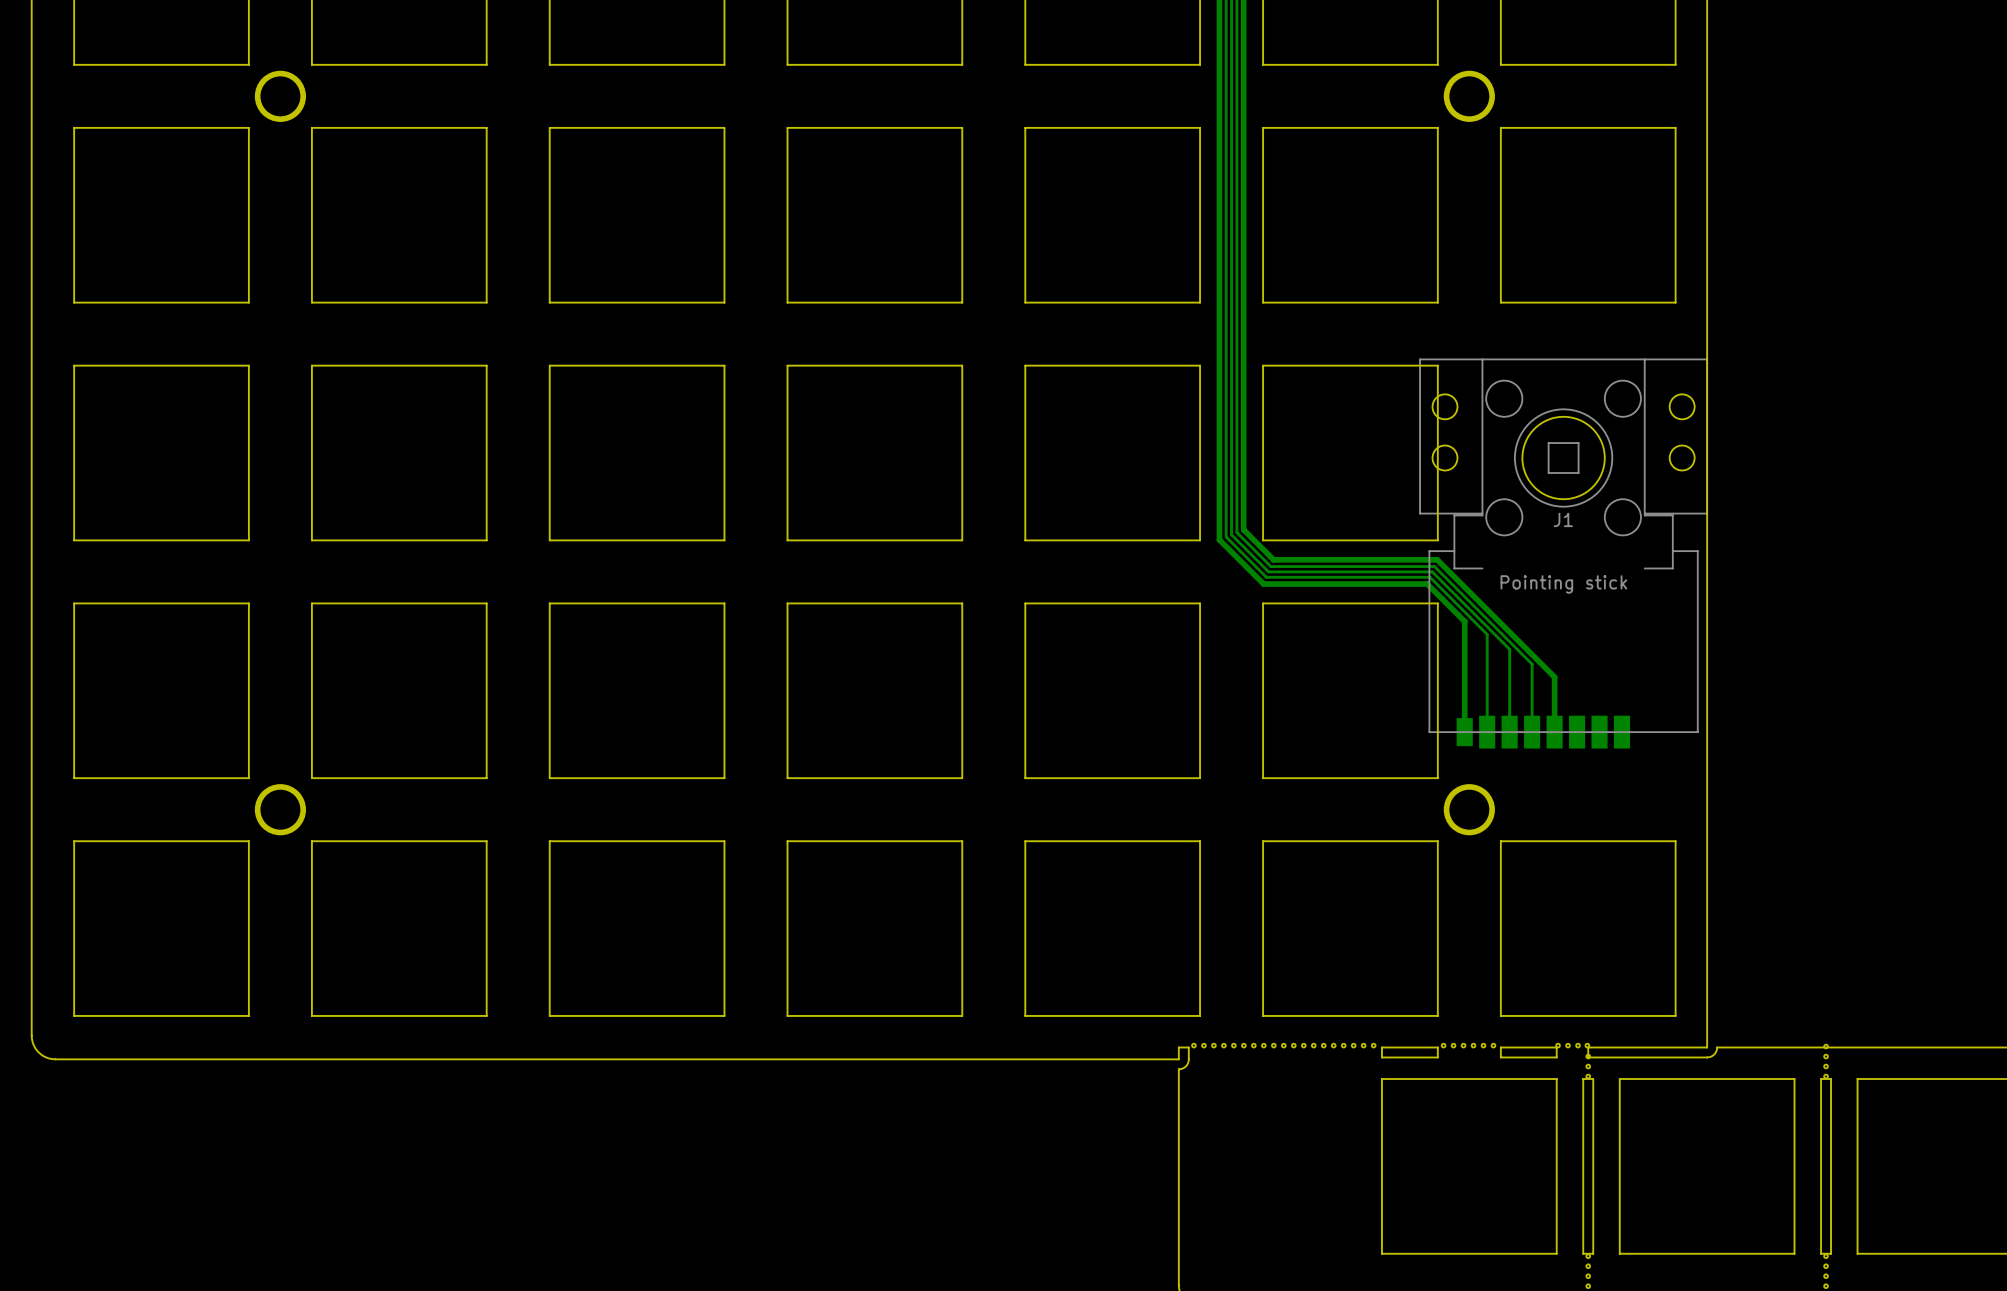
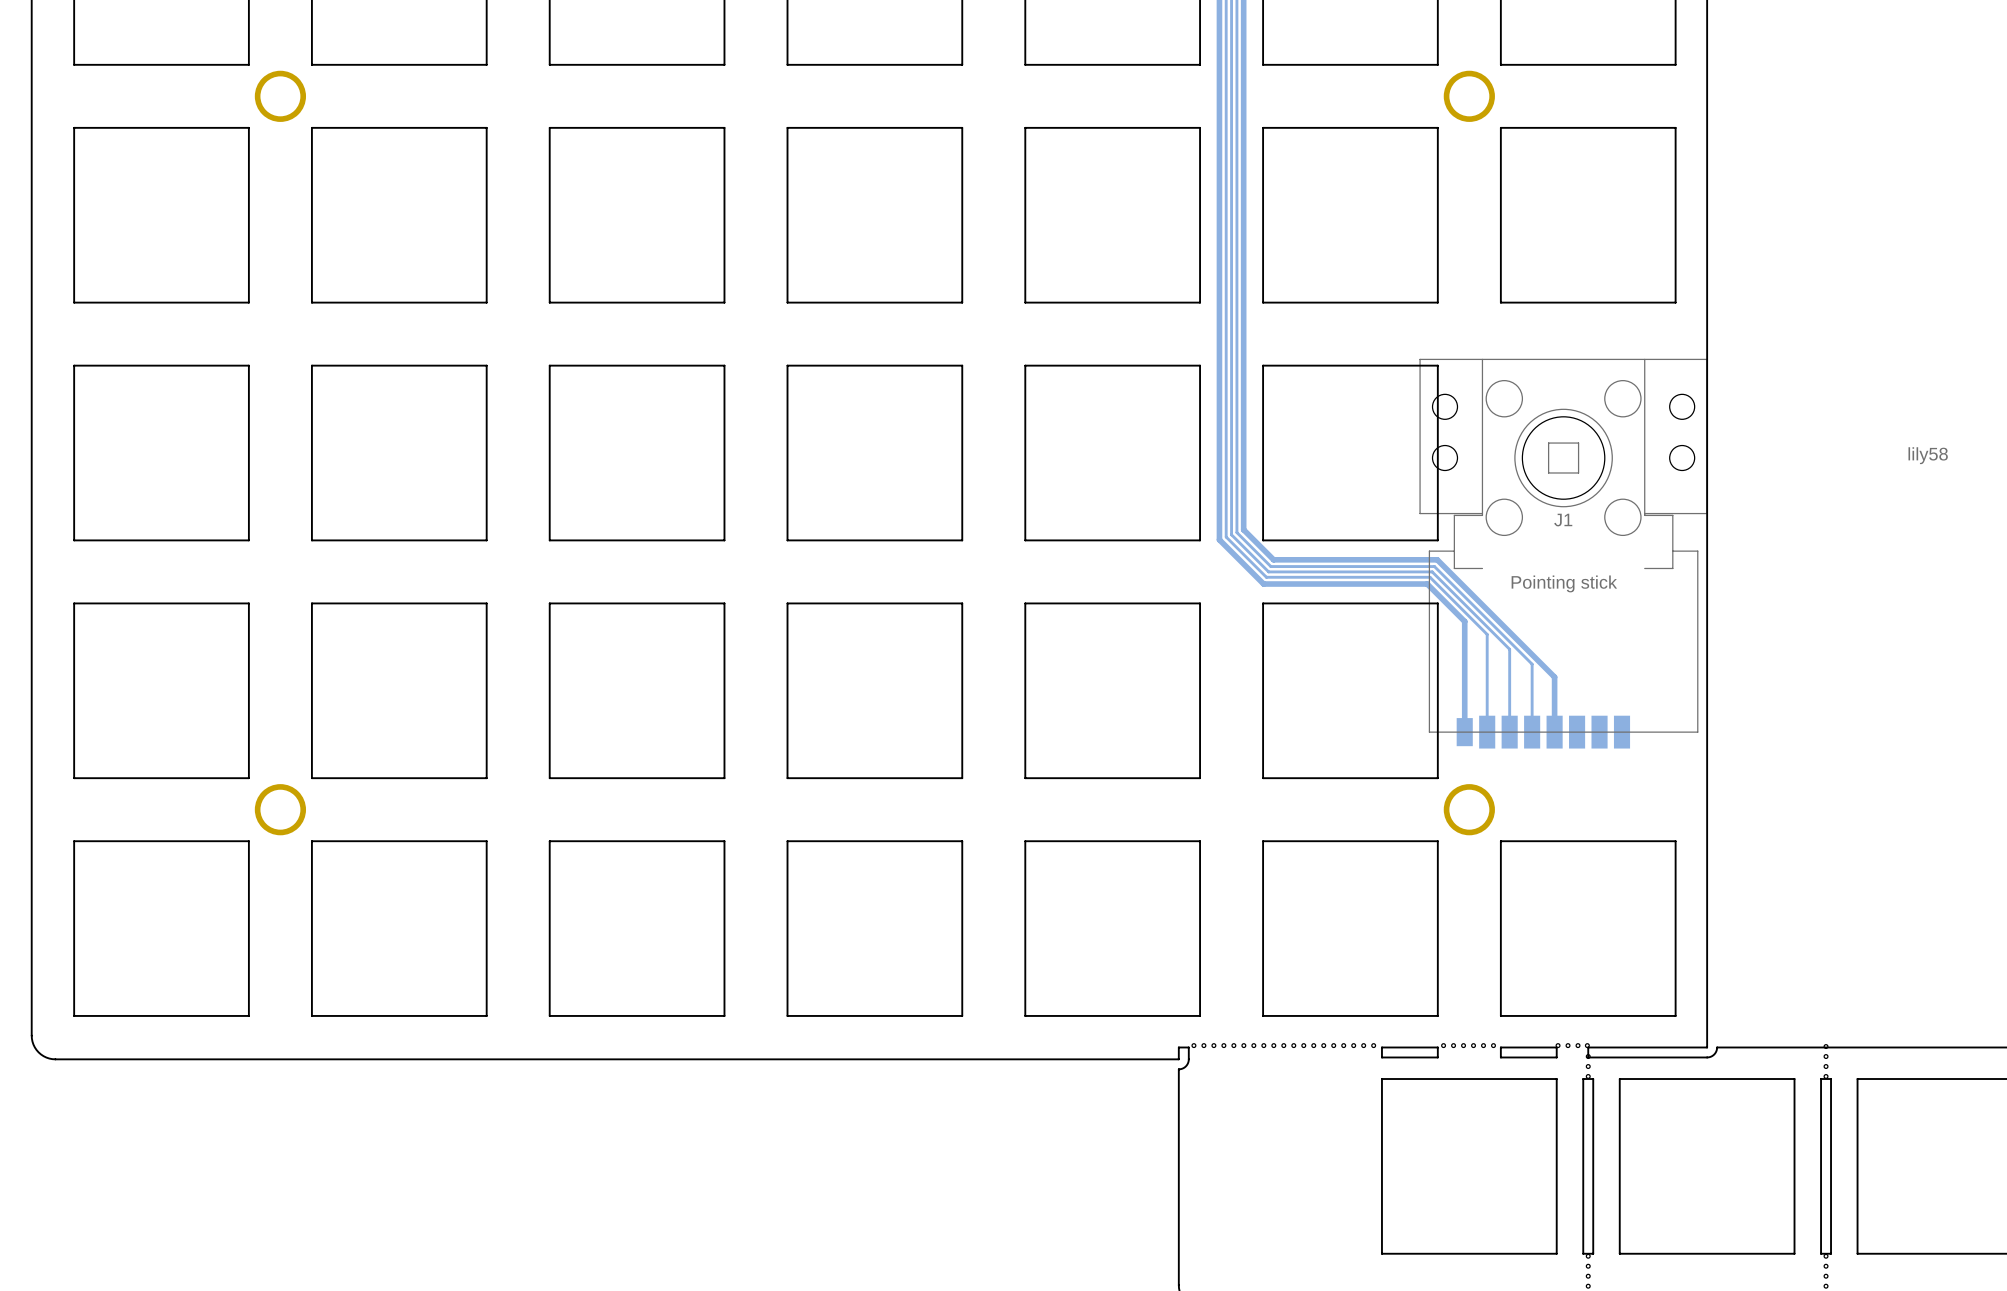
text: none -> lily58 (1928, 455)

